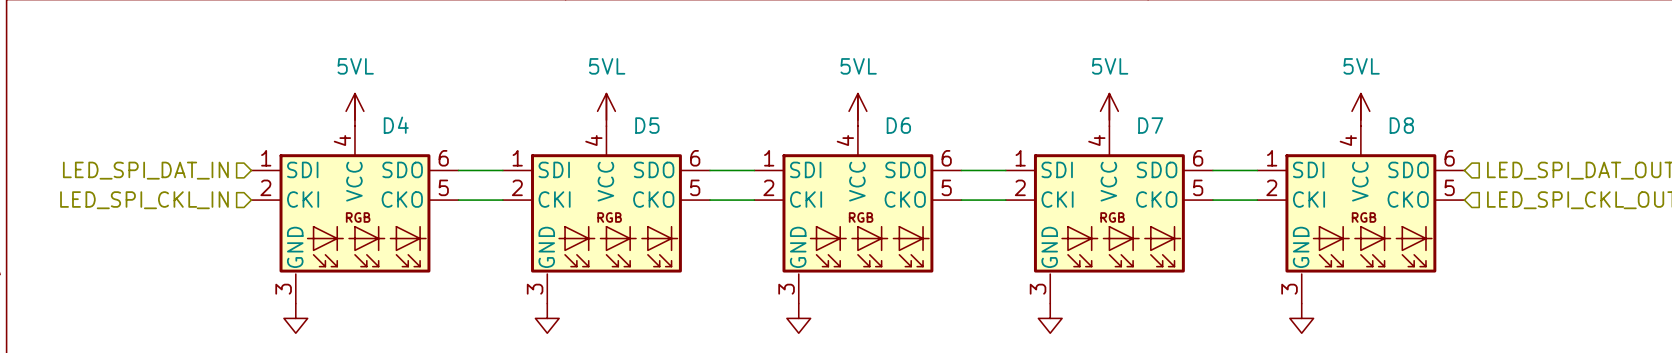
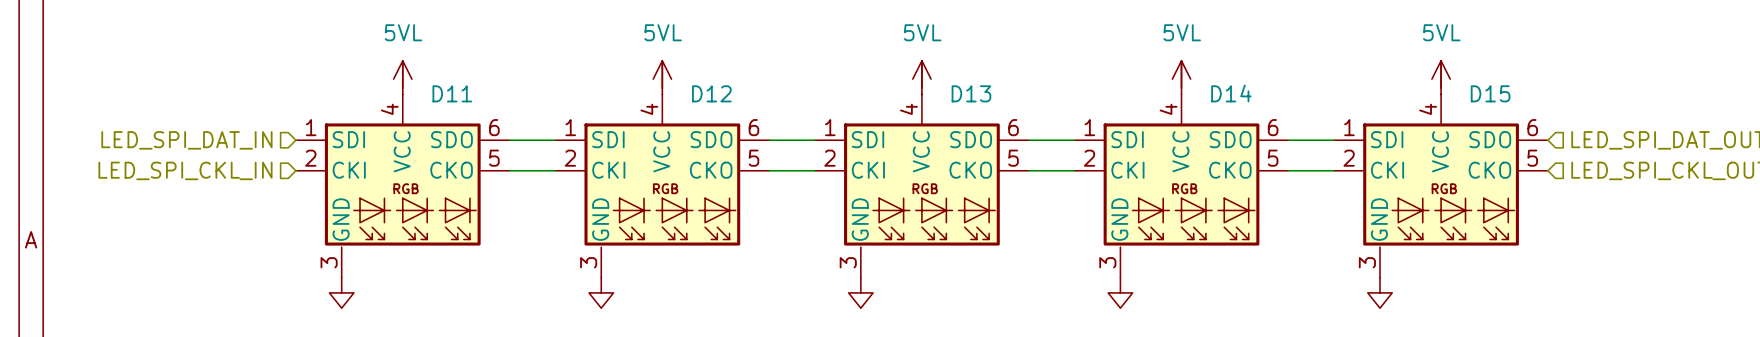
D4 name: D4 (396, 125) -> D11 (452, 93)
D5 name: D5 (647, 125) -> D12 (711, 93)
D6 name: D6 (898, 125) -> D13 (971, 93)
D7 name: D7 (1150, 125) -> D14 (1231, 93)
D8 name: D8 (1401, 125) -> D15 (1490, 93)

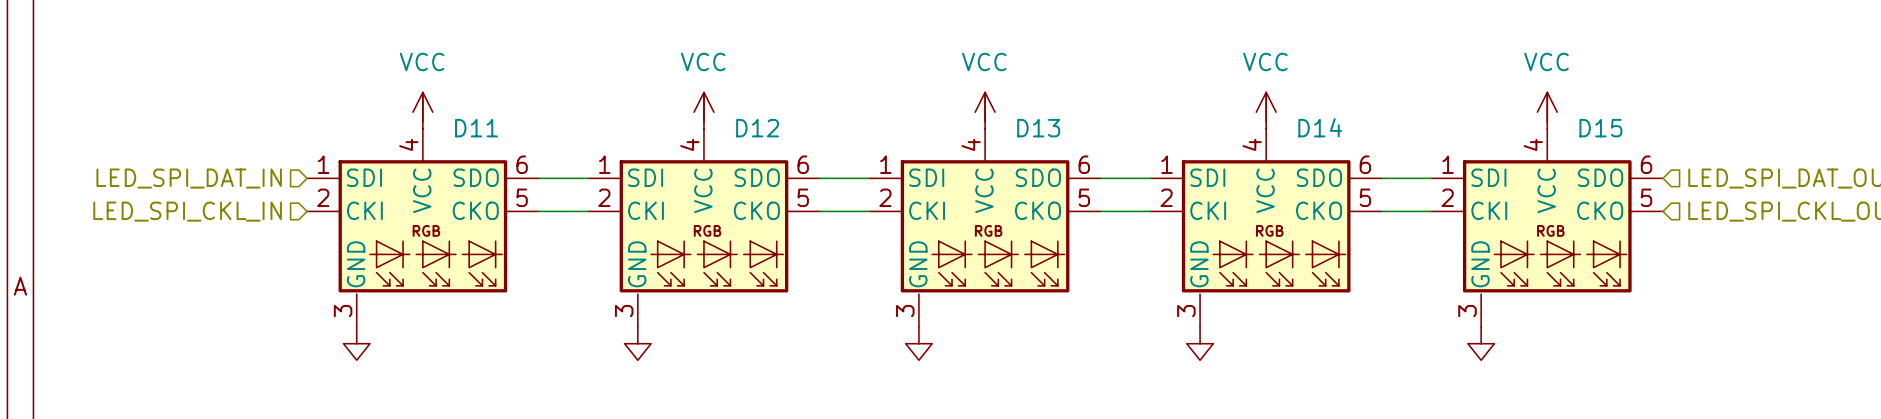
power symbol: 5VL (402, 77) -> VCC (422, 110)
power symbol: 5VL (662, 77) -> VCC (703, 110)
power symbol: 5VL (921, 77) -> VCC (985, 110)
power symbol: 5VL (1181, 77) -> VCC (1266, 110)
power symbol: 5VL (1441, 77) -> VCC (1547, 110)

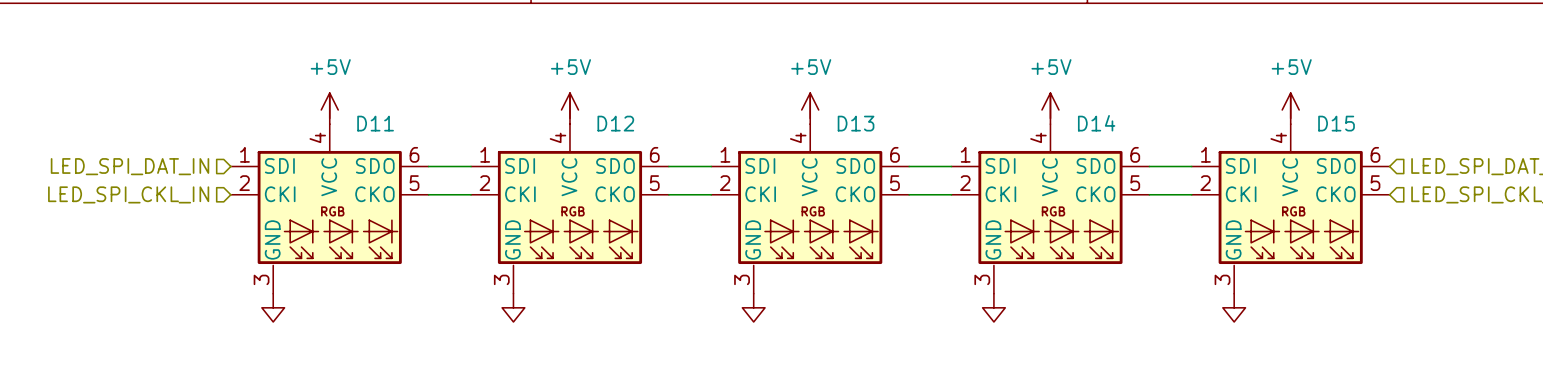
power symbol: VCC (422, 110) -> +5V (329, 108)
power symbol: VCC (703, 110) -> +5V (569, 108)
power symbol: VCC (985, 110) -> +5V (810, 108)
power symbol: VCC (1266, 110) -> +5V (1050, 108)
power symbol: VCC (1547, 110) -> +5V (1290, 108)

